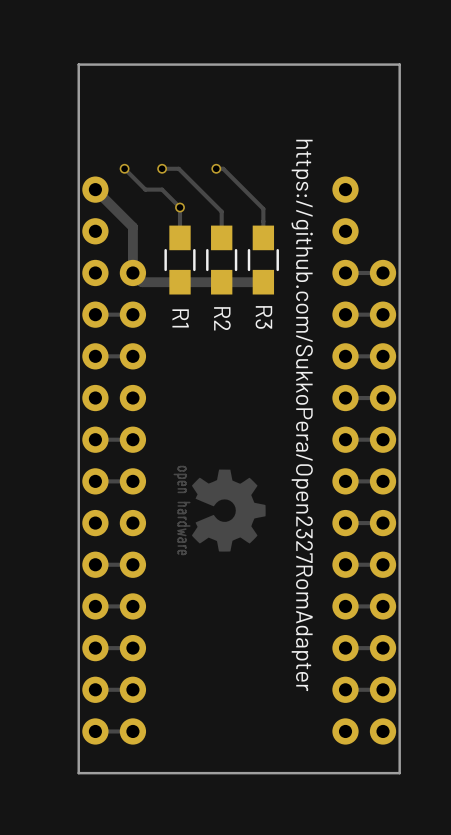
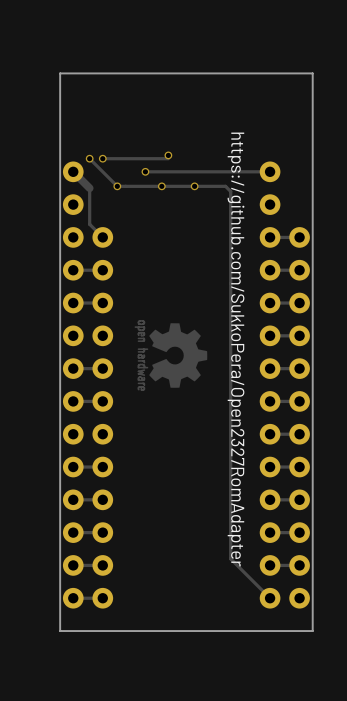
track: (124, 168) (145, 189) (162, 189) (180, 207) (180, 237) -> none
via: (124, 168) -> none
track: (162, 168) (178, 168) (221, 211) (221, 237) -> none
via: (162, 168) -> none
track: (216, 168) (223, 168) (263, 208) (263, 237) -> none
track: none -> (89, 158) (117, 186) (225, 186) (230, 191) (230, 558) (270, 598)
via: none -> (89, 158)
via: none -> (102, 158)
track: none -> (168, 158) (102, 158)
via: none -> (145, 171)
track: none -> (270, 171) (145, 171)
via: (180, 207) -> none
via: none -> (117, 186)
via: none -> (161, 186)
via: none -> (194, 186)
track: (116, 210) (132, 227) (132, 272) (142, 282) (263, 282) -> (89, 188) (89, 224) (102, 237)
R1: (180, 260) -> none
R2: (221, 260) -> none
R3: (263, 260) -> none
drawing position: (219, 510) -> (171, 355)

